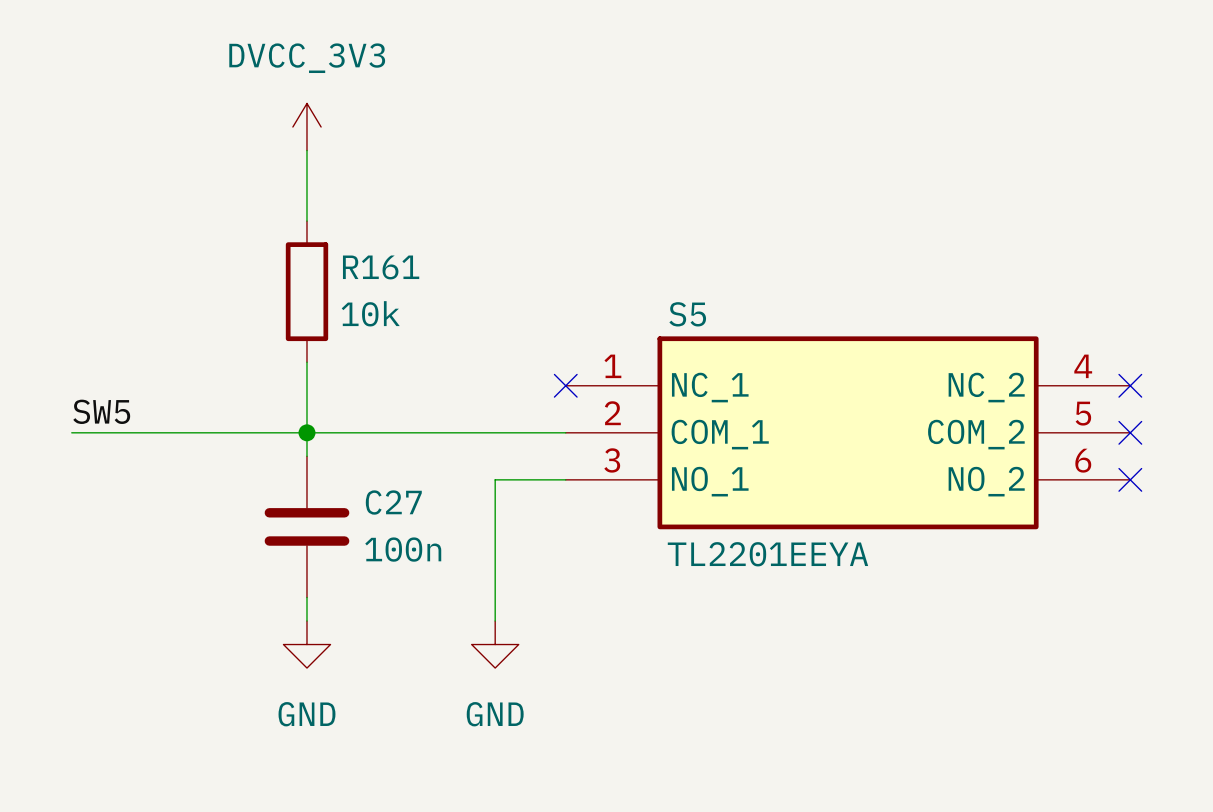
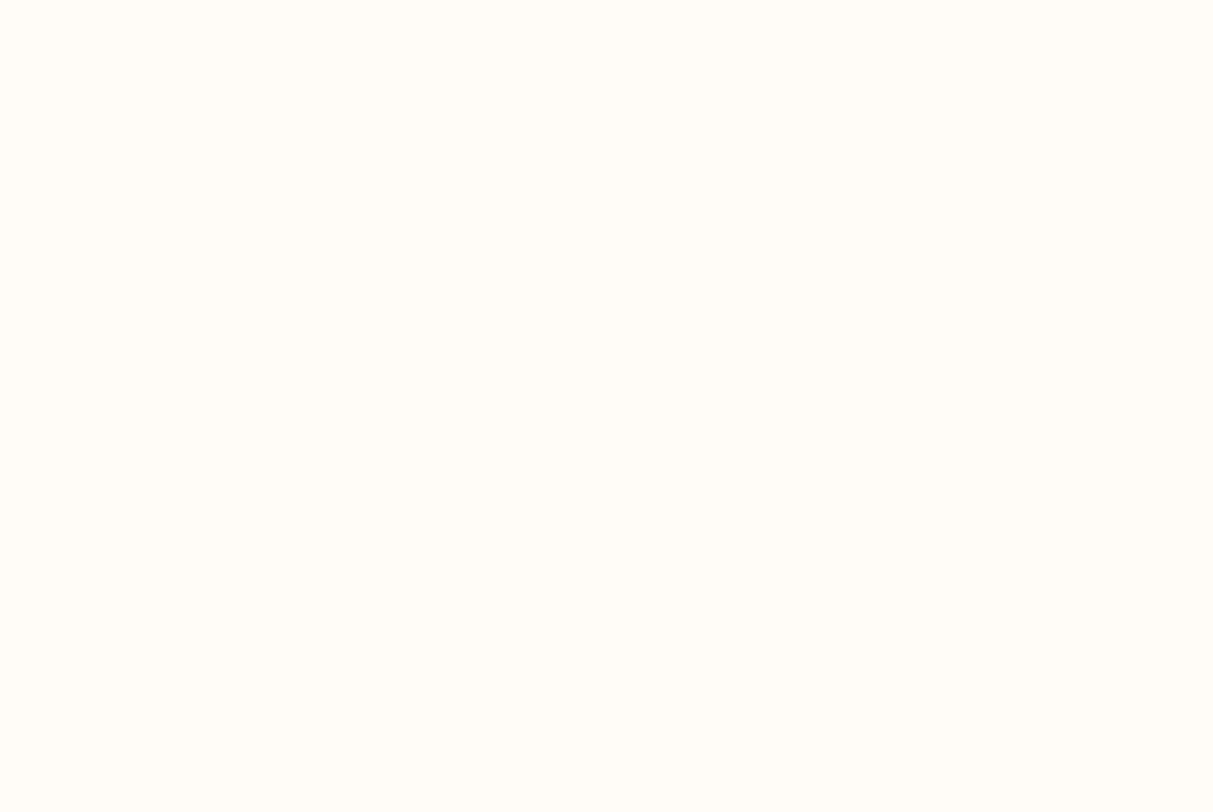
power symbol: DVCC_3V3 (306, 127) -> none
wire: (306, 150) (306, 221) -> none
R161: 10k (306, 291) -> none
wire: (306, 362) (306, 456) -> none
no-connect mark: (565, 385) -> none
no-connect mark: (1130, 385) -> none
label: SW5 (101, 411) -> none
wire: (71, 432) (565, 432) -> none
junction: (306, 432) -> none
S5: TL2201EEYA (848, 432) -> none
no-connect mark: (1130, 432) -> none
wire: (565, 479) (495, 479) (495, 621) -> none
no-connect mark: (1130, 479) -> none
C27: 100n (306, 526) -> none
wire: (306, 597) (306, 621) -> none
power symbol: GND (306, 644) -> none
power symbol: GND (495, 644) -> none

